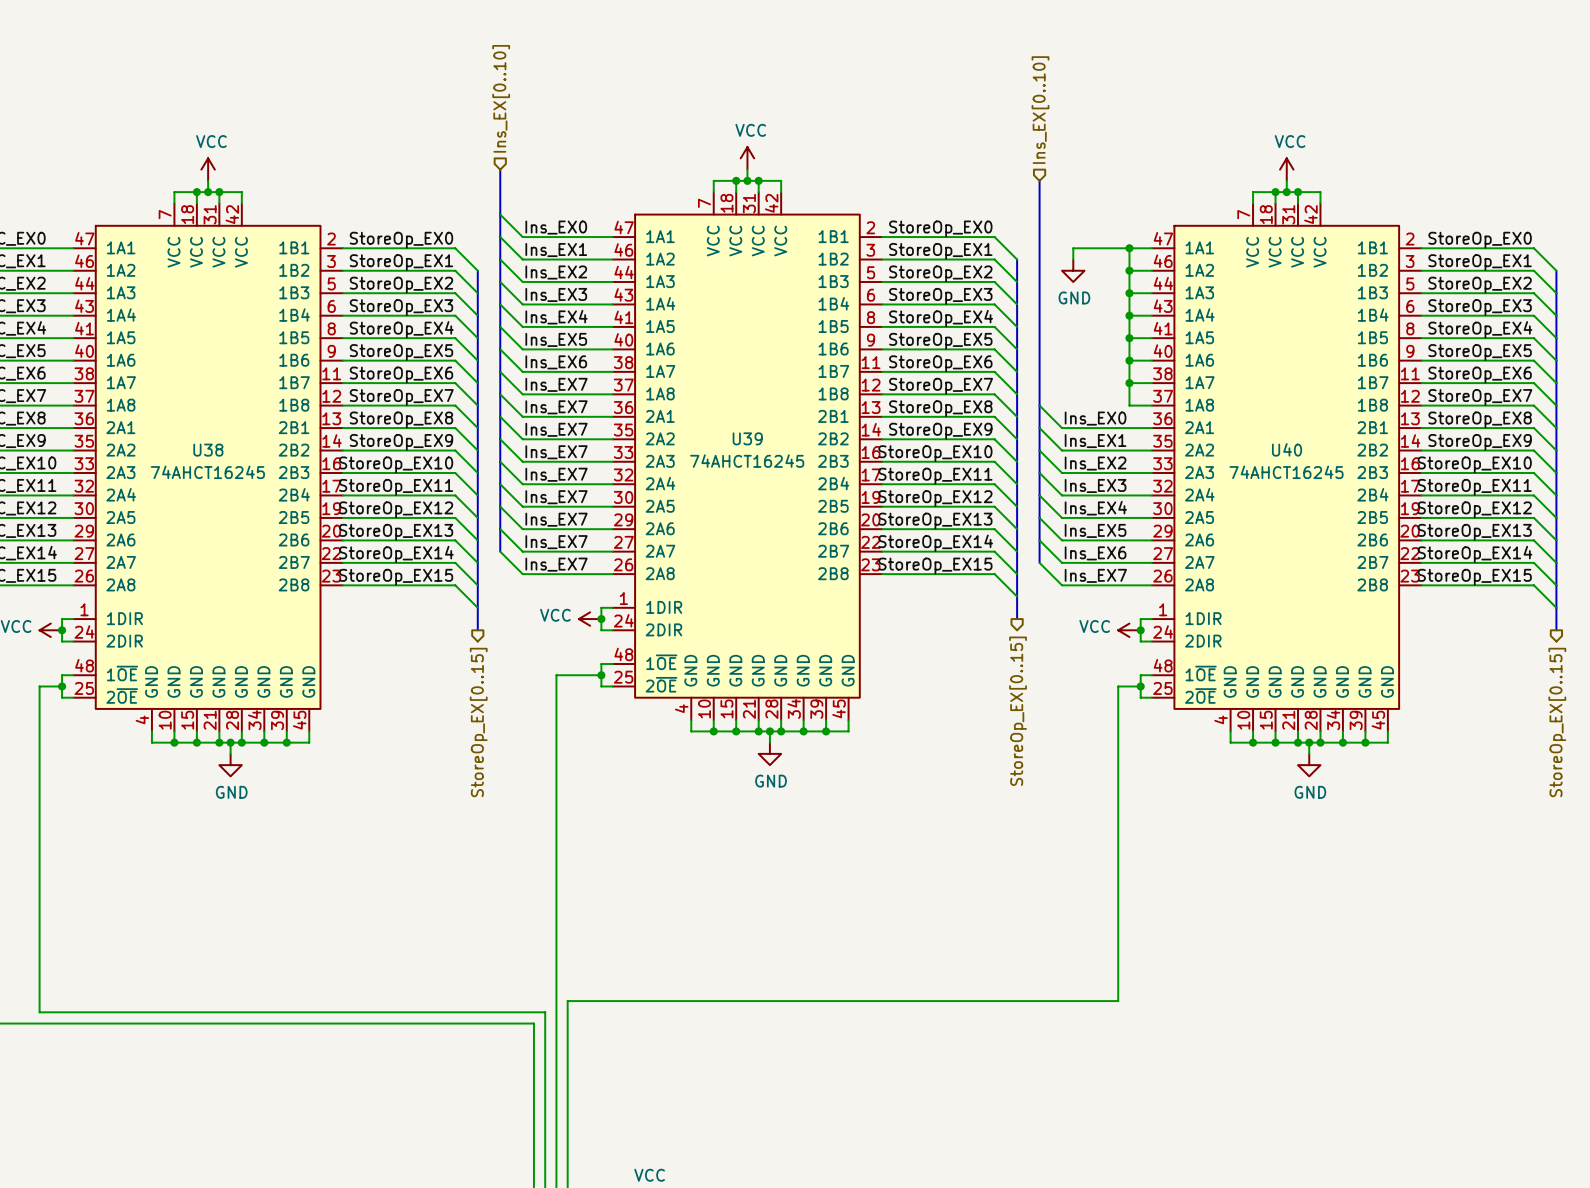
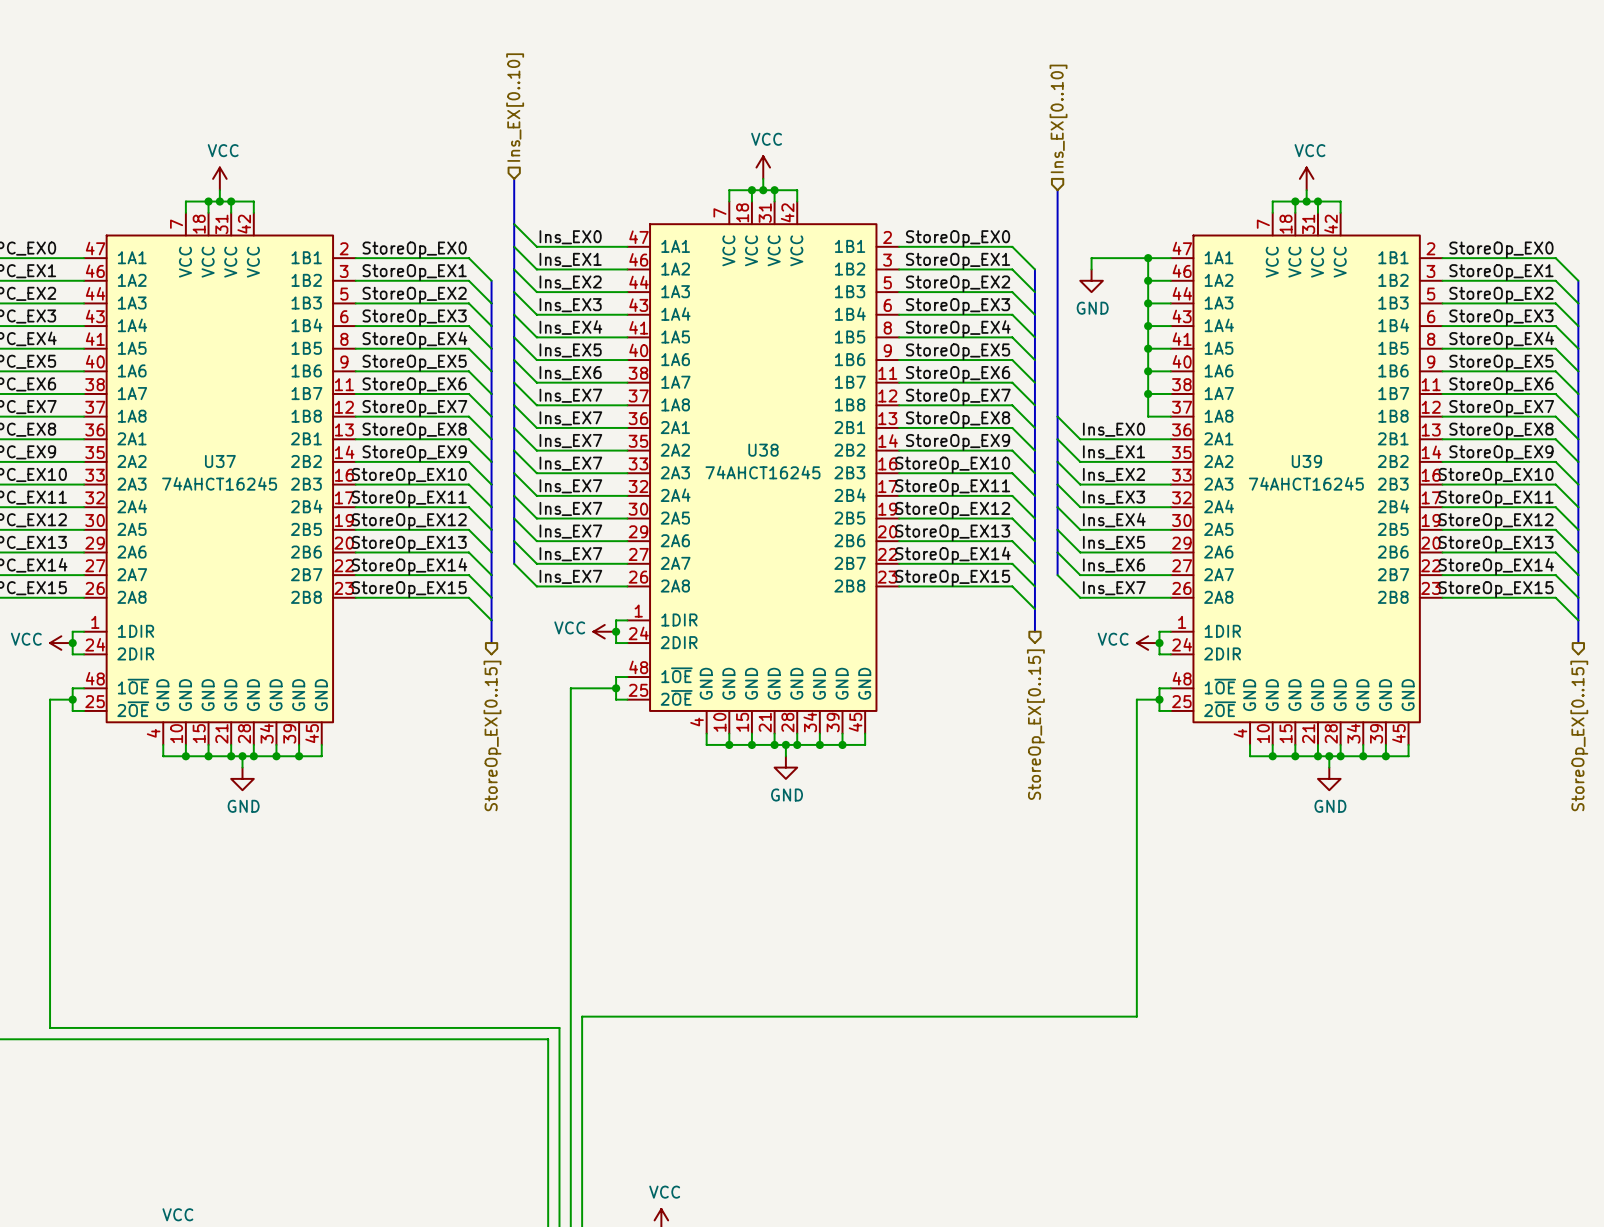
U39 name: U39 (747, 438) -> U38 (763, 450)
U40 name: U40 (1287, 449) -> U39 (1306, 461)
U38 name: U38 (208, 450) -> U37 (220, 461)

